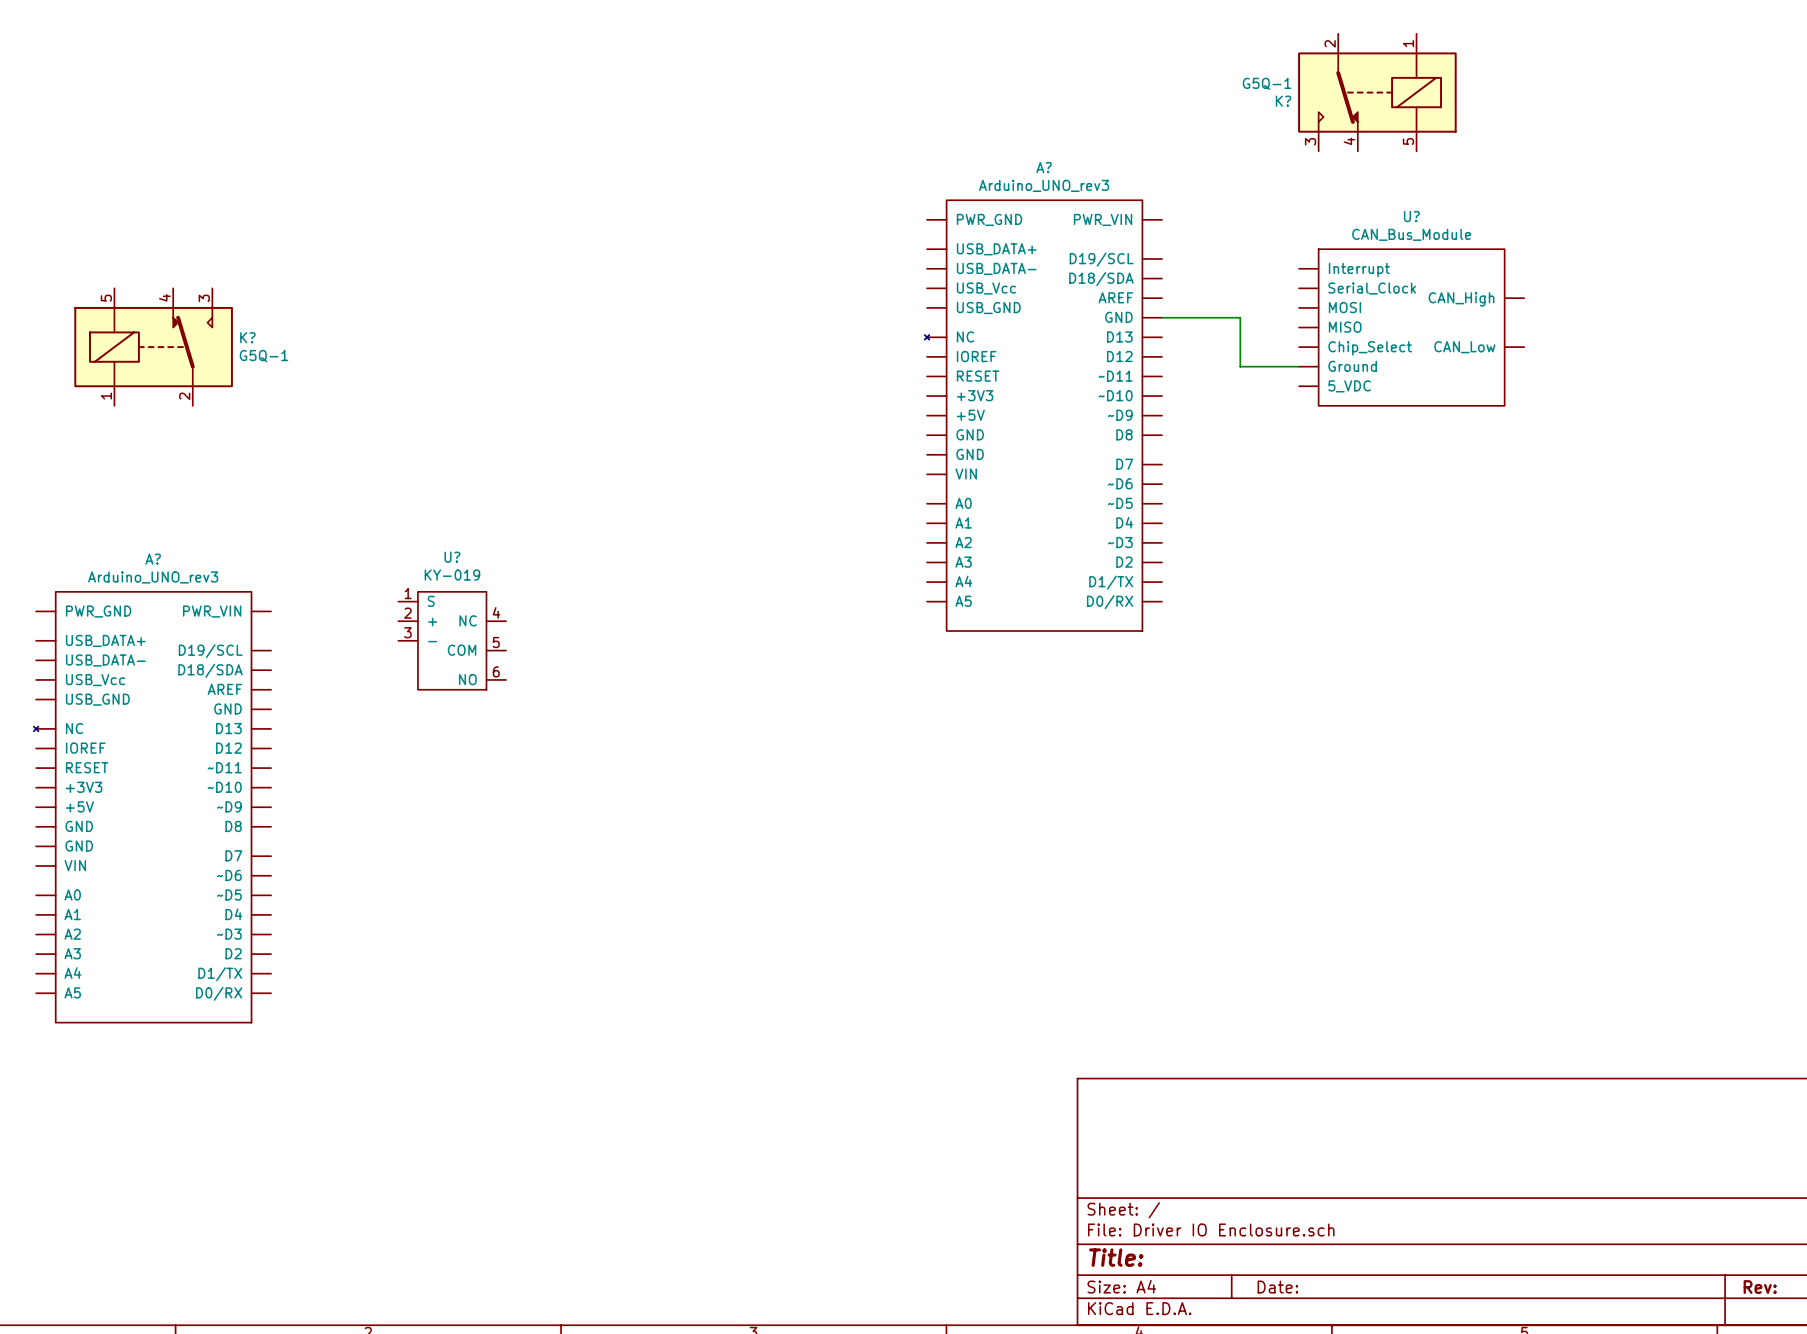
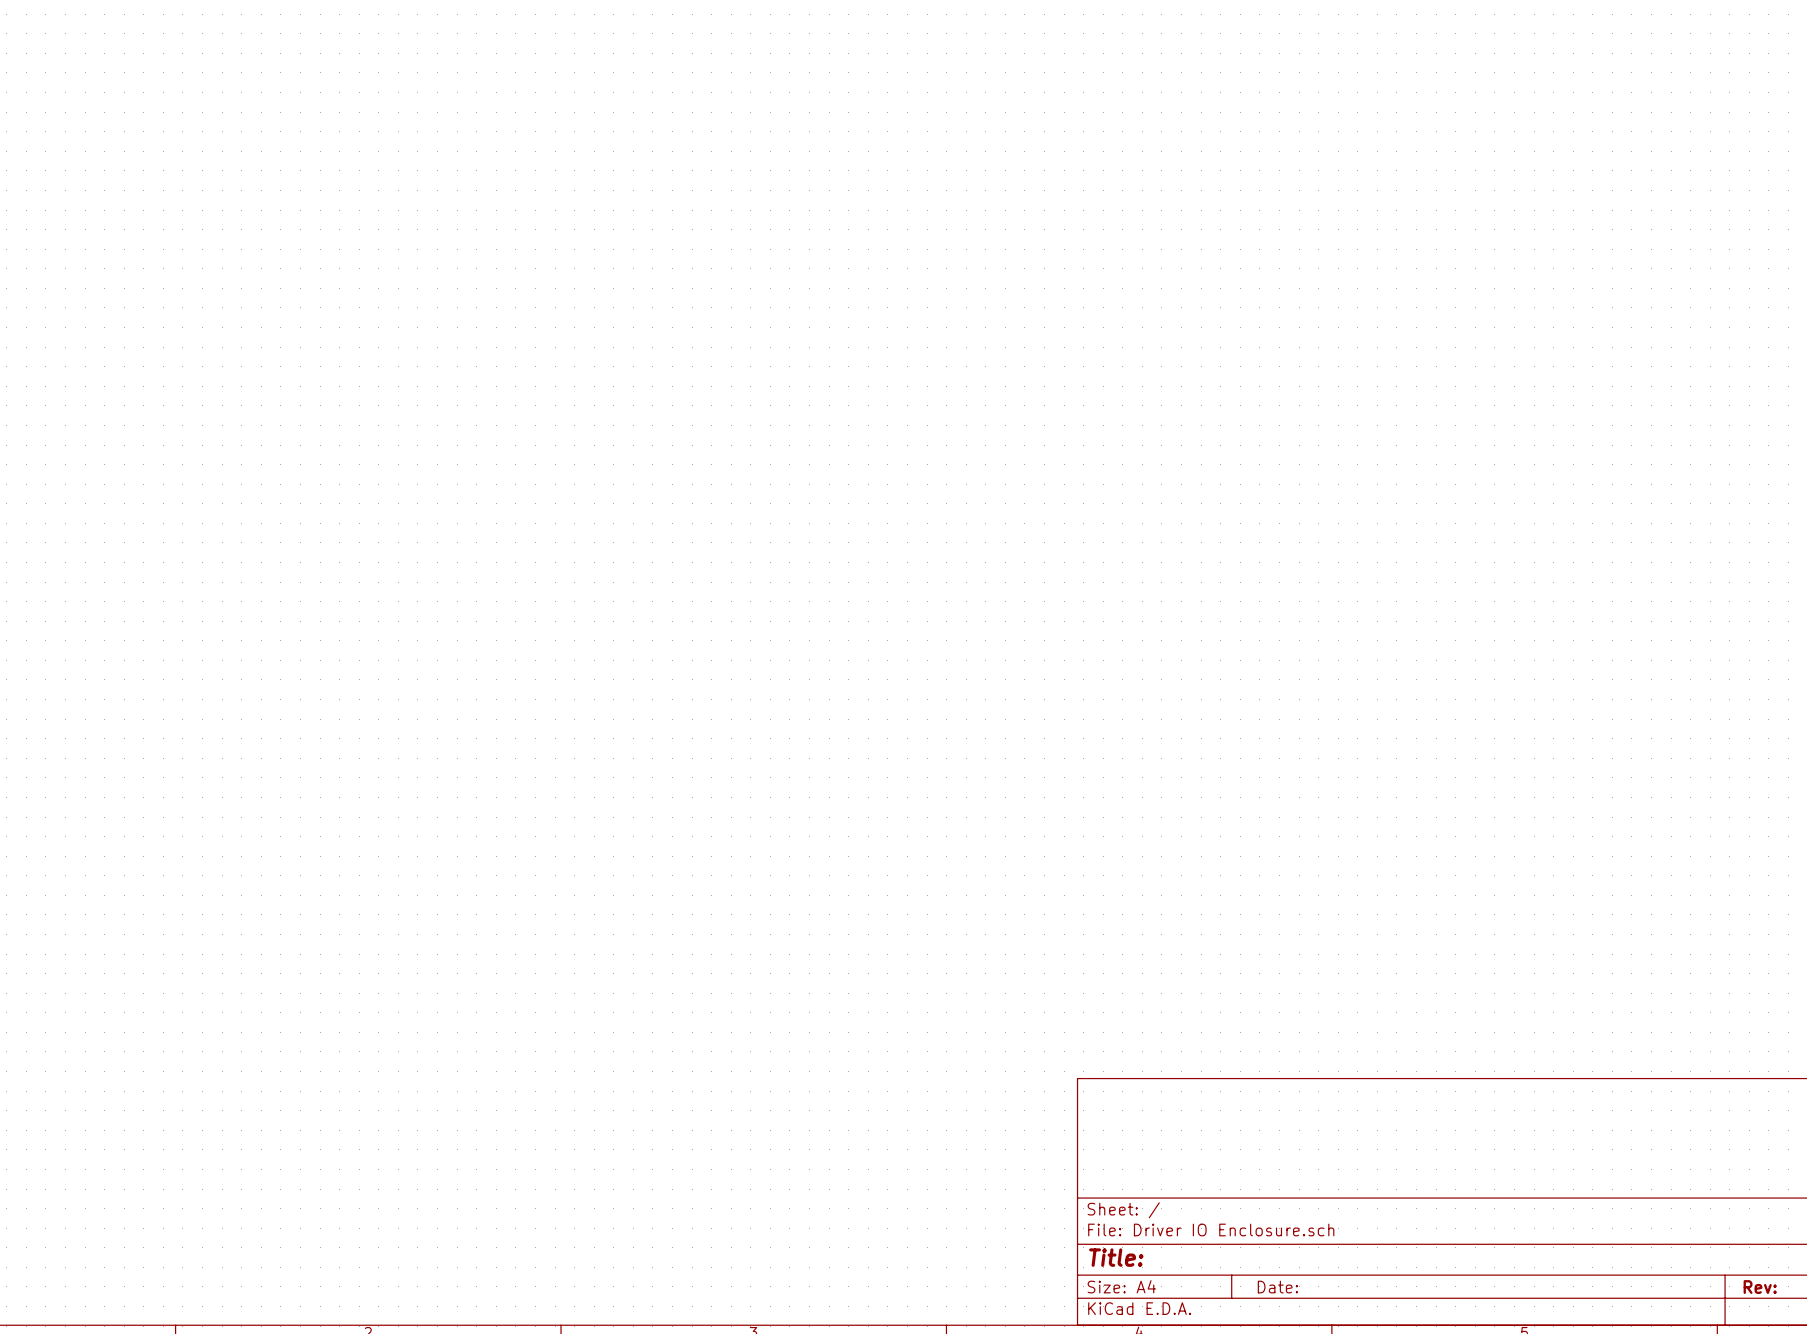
K?: G5Q-1 (1377, 92) -> none
wire: (1161, 317) (1240, 317) (1240, 366) (1299, 366) -> none
U?: CAN_Bus_Module (1411, 327) -> none
K?: G5Q-1 (153, 347) -> none
A?: Arduino_UNO_rev3 (1043, 415) -> none
U?: KY-019 (452, 640) -> none
A?: Arduino_UNO_rev3 (152, 807) -> none

